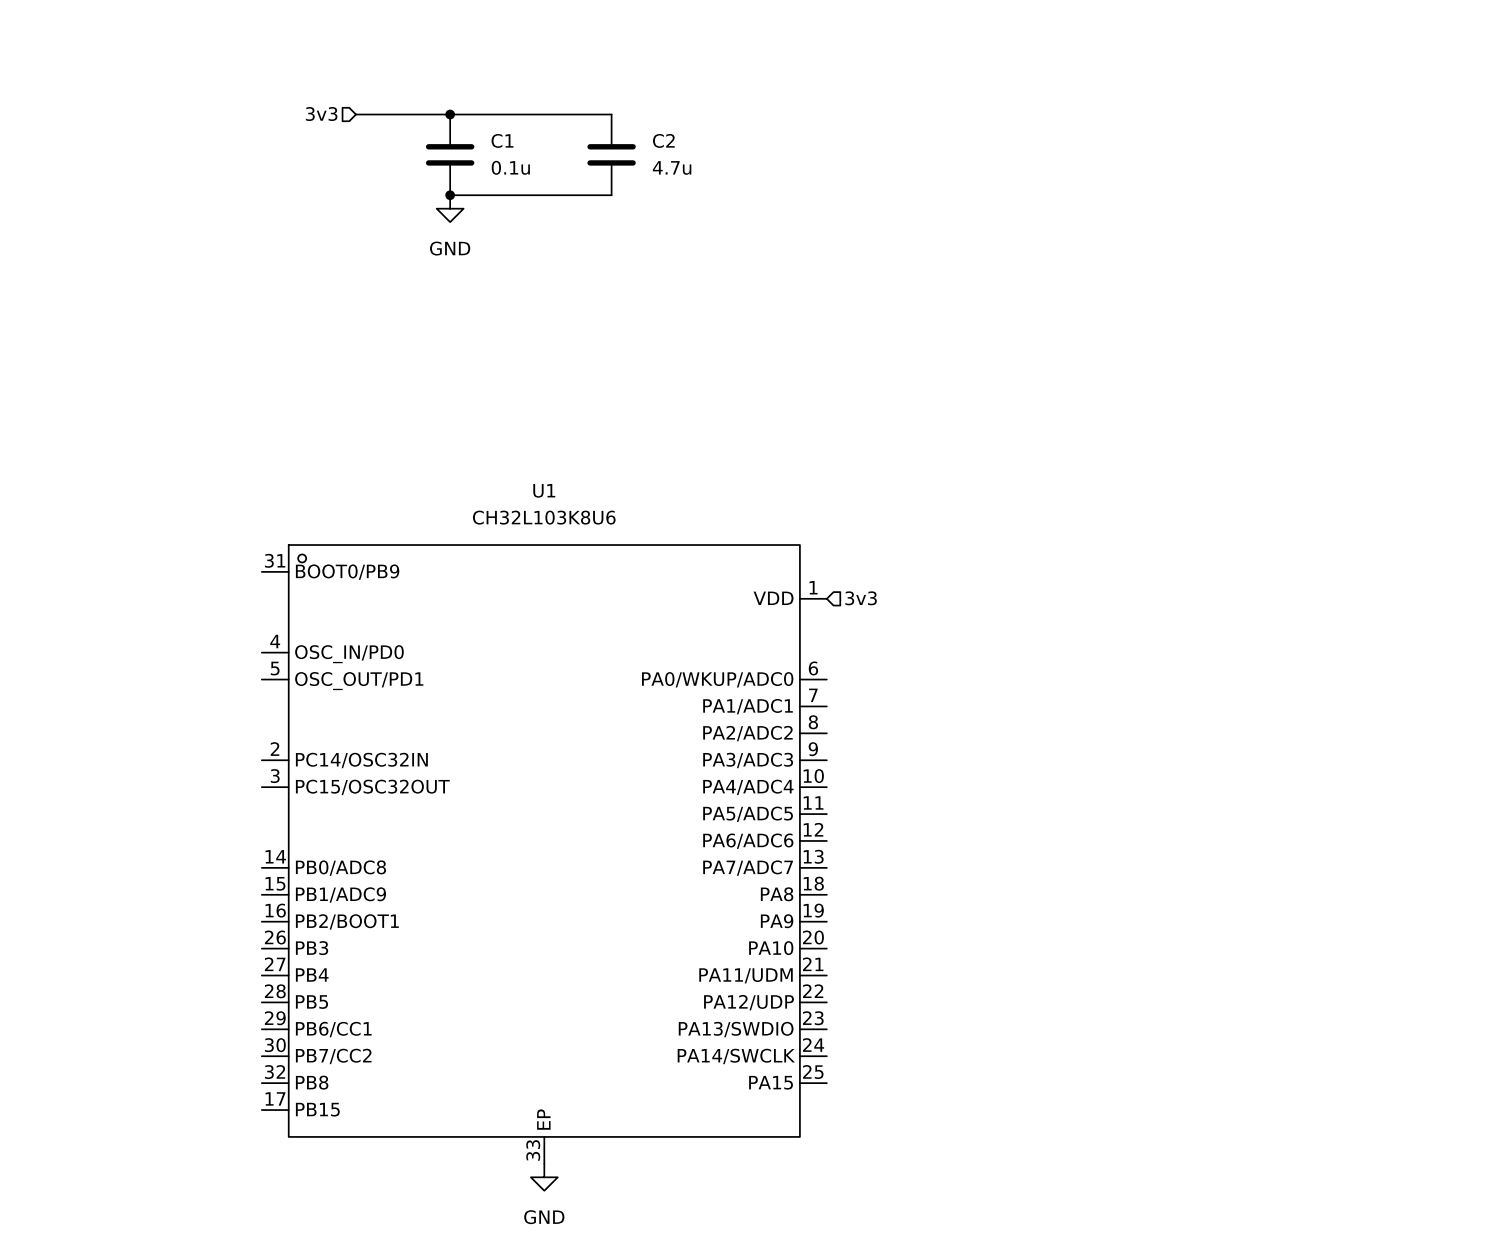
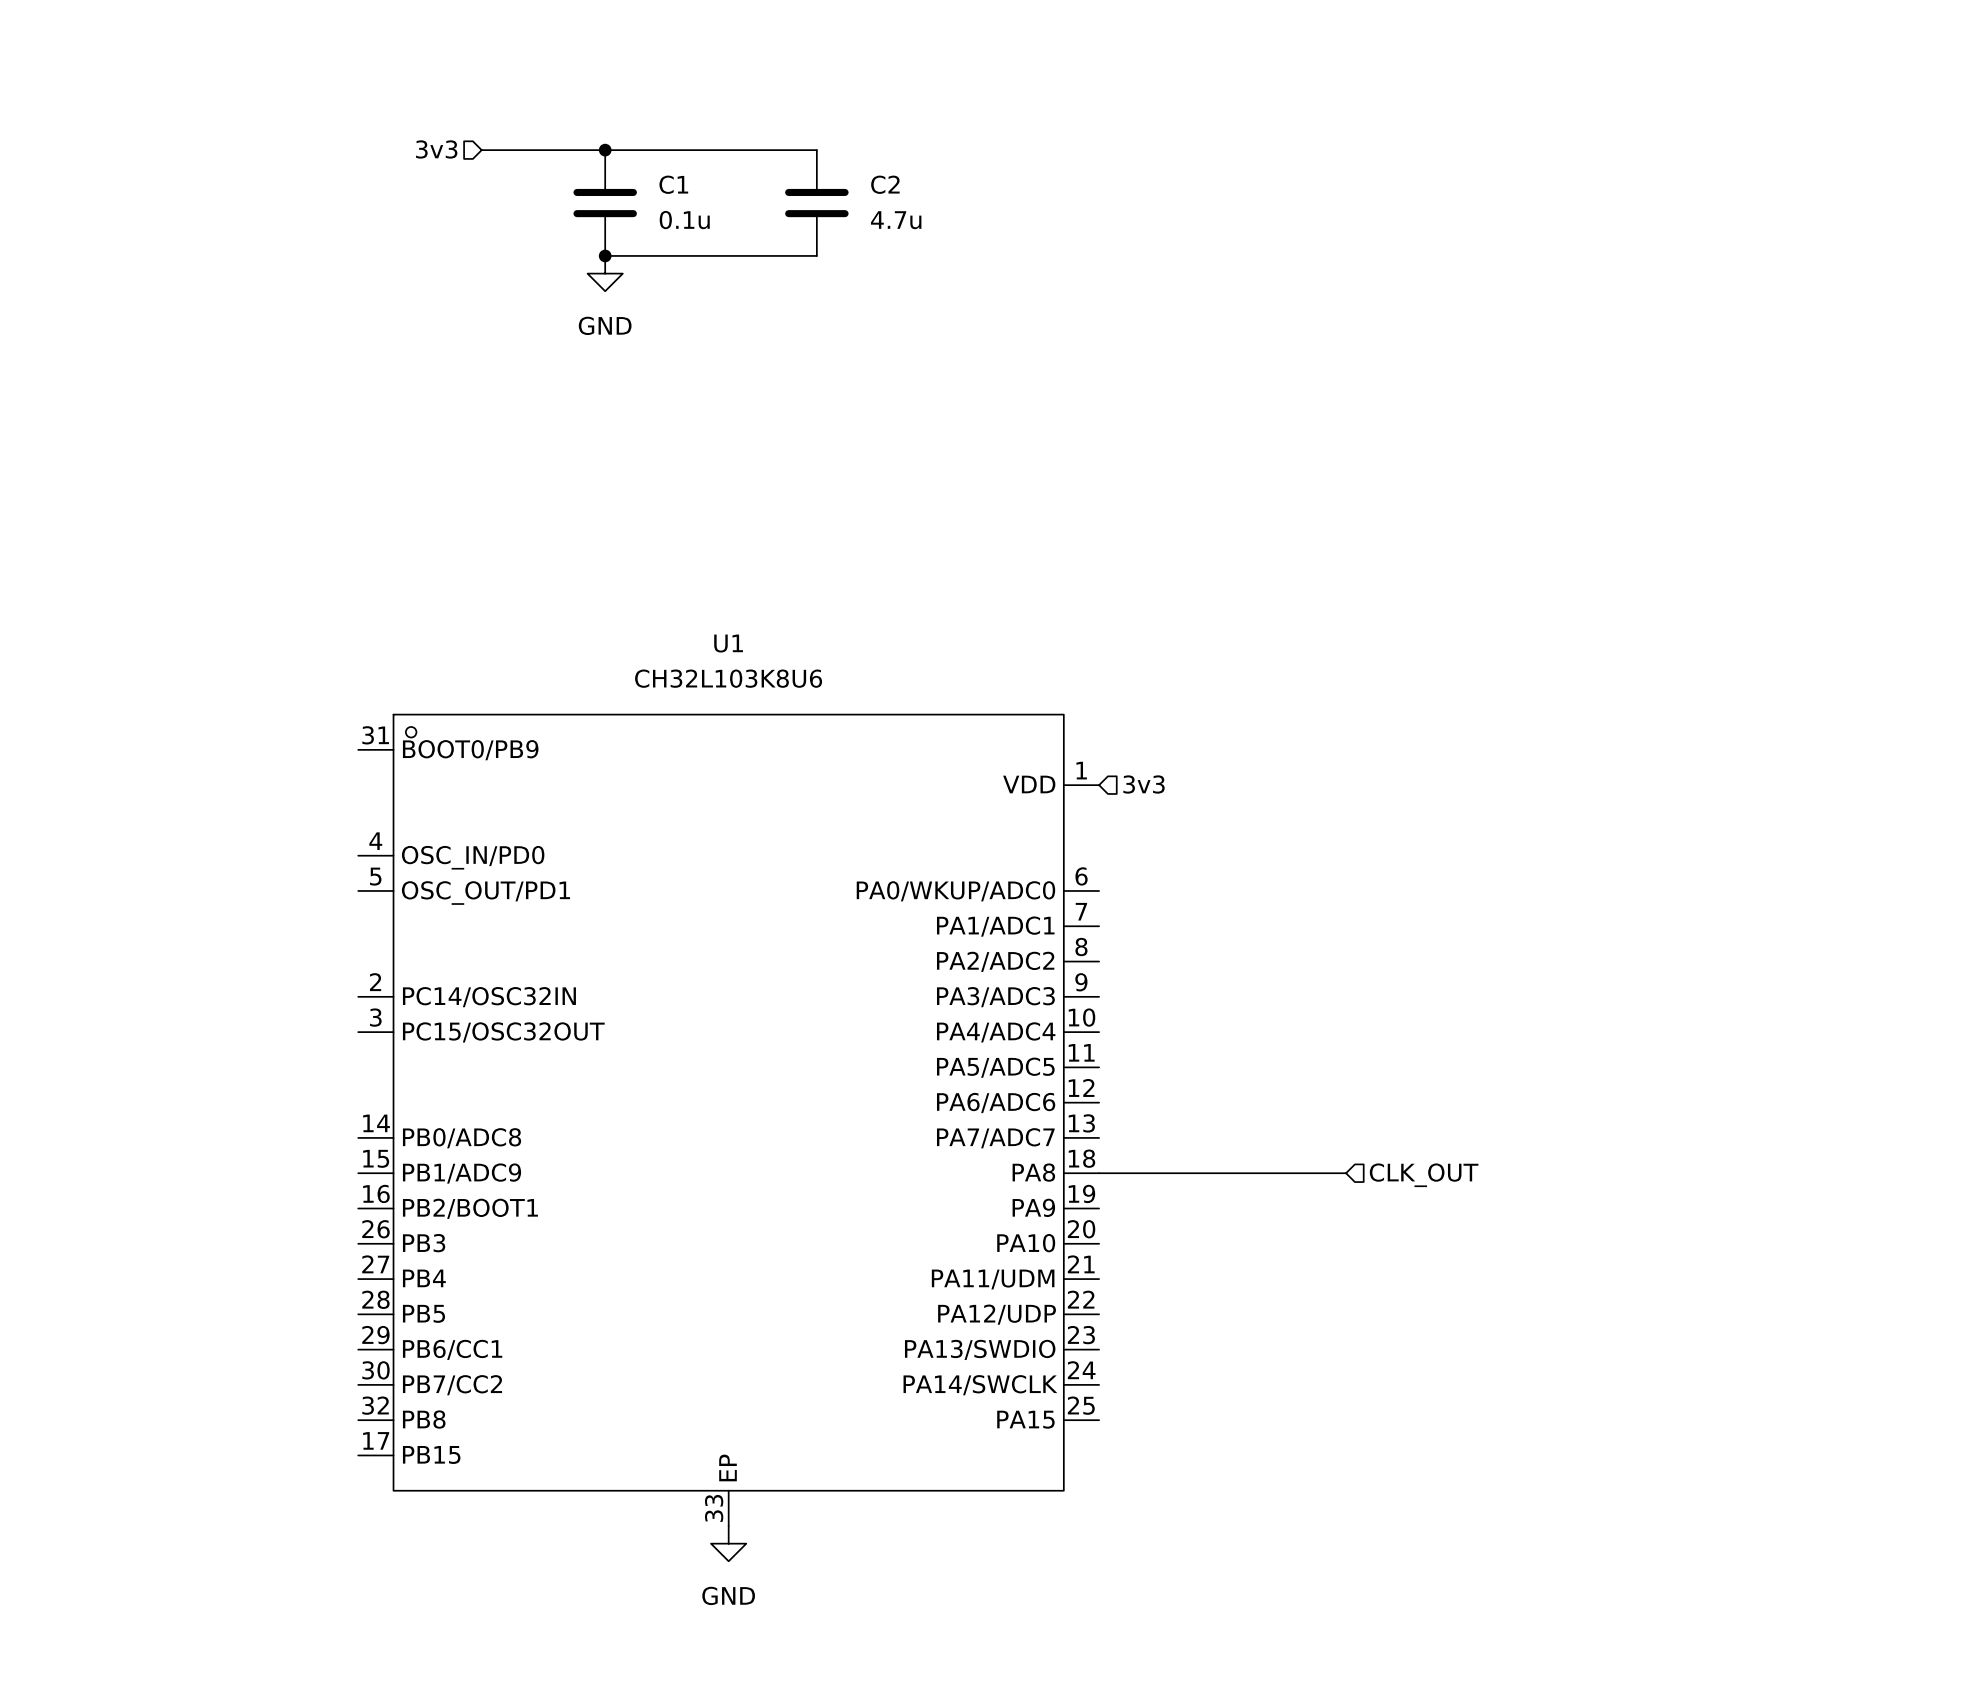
wire: none -> (1099, 1173) (1346, 1173)
hierarchical label: none -> CLK_OUT (1424, 1175)

